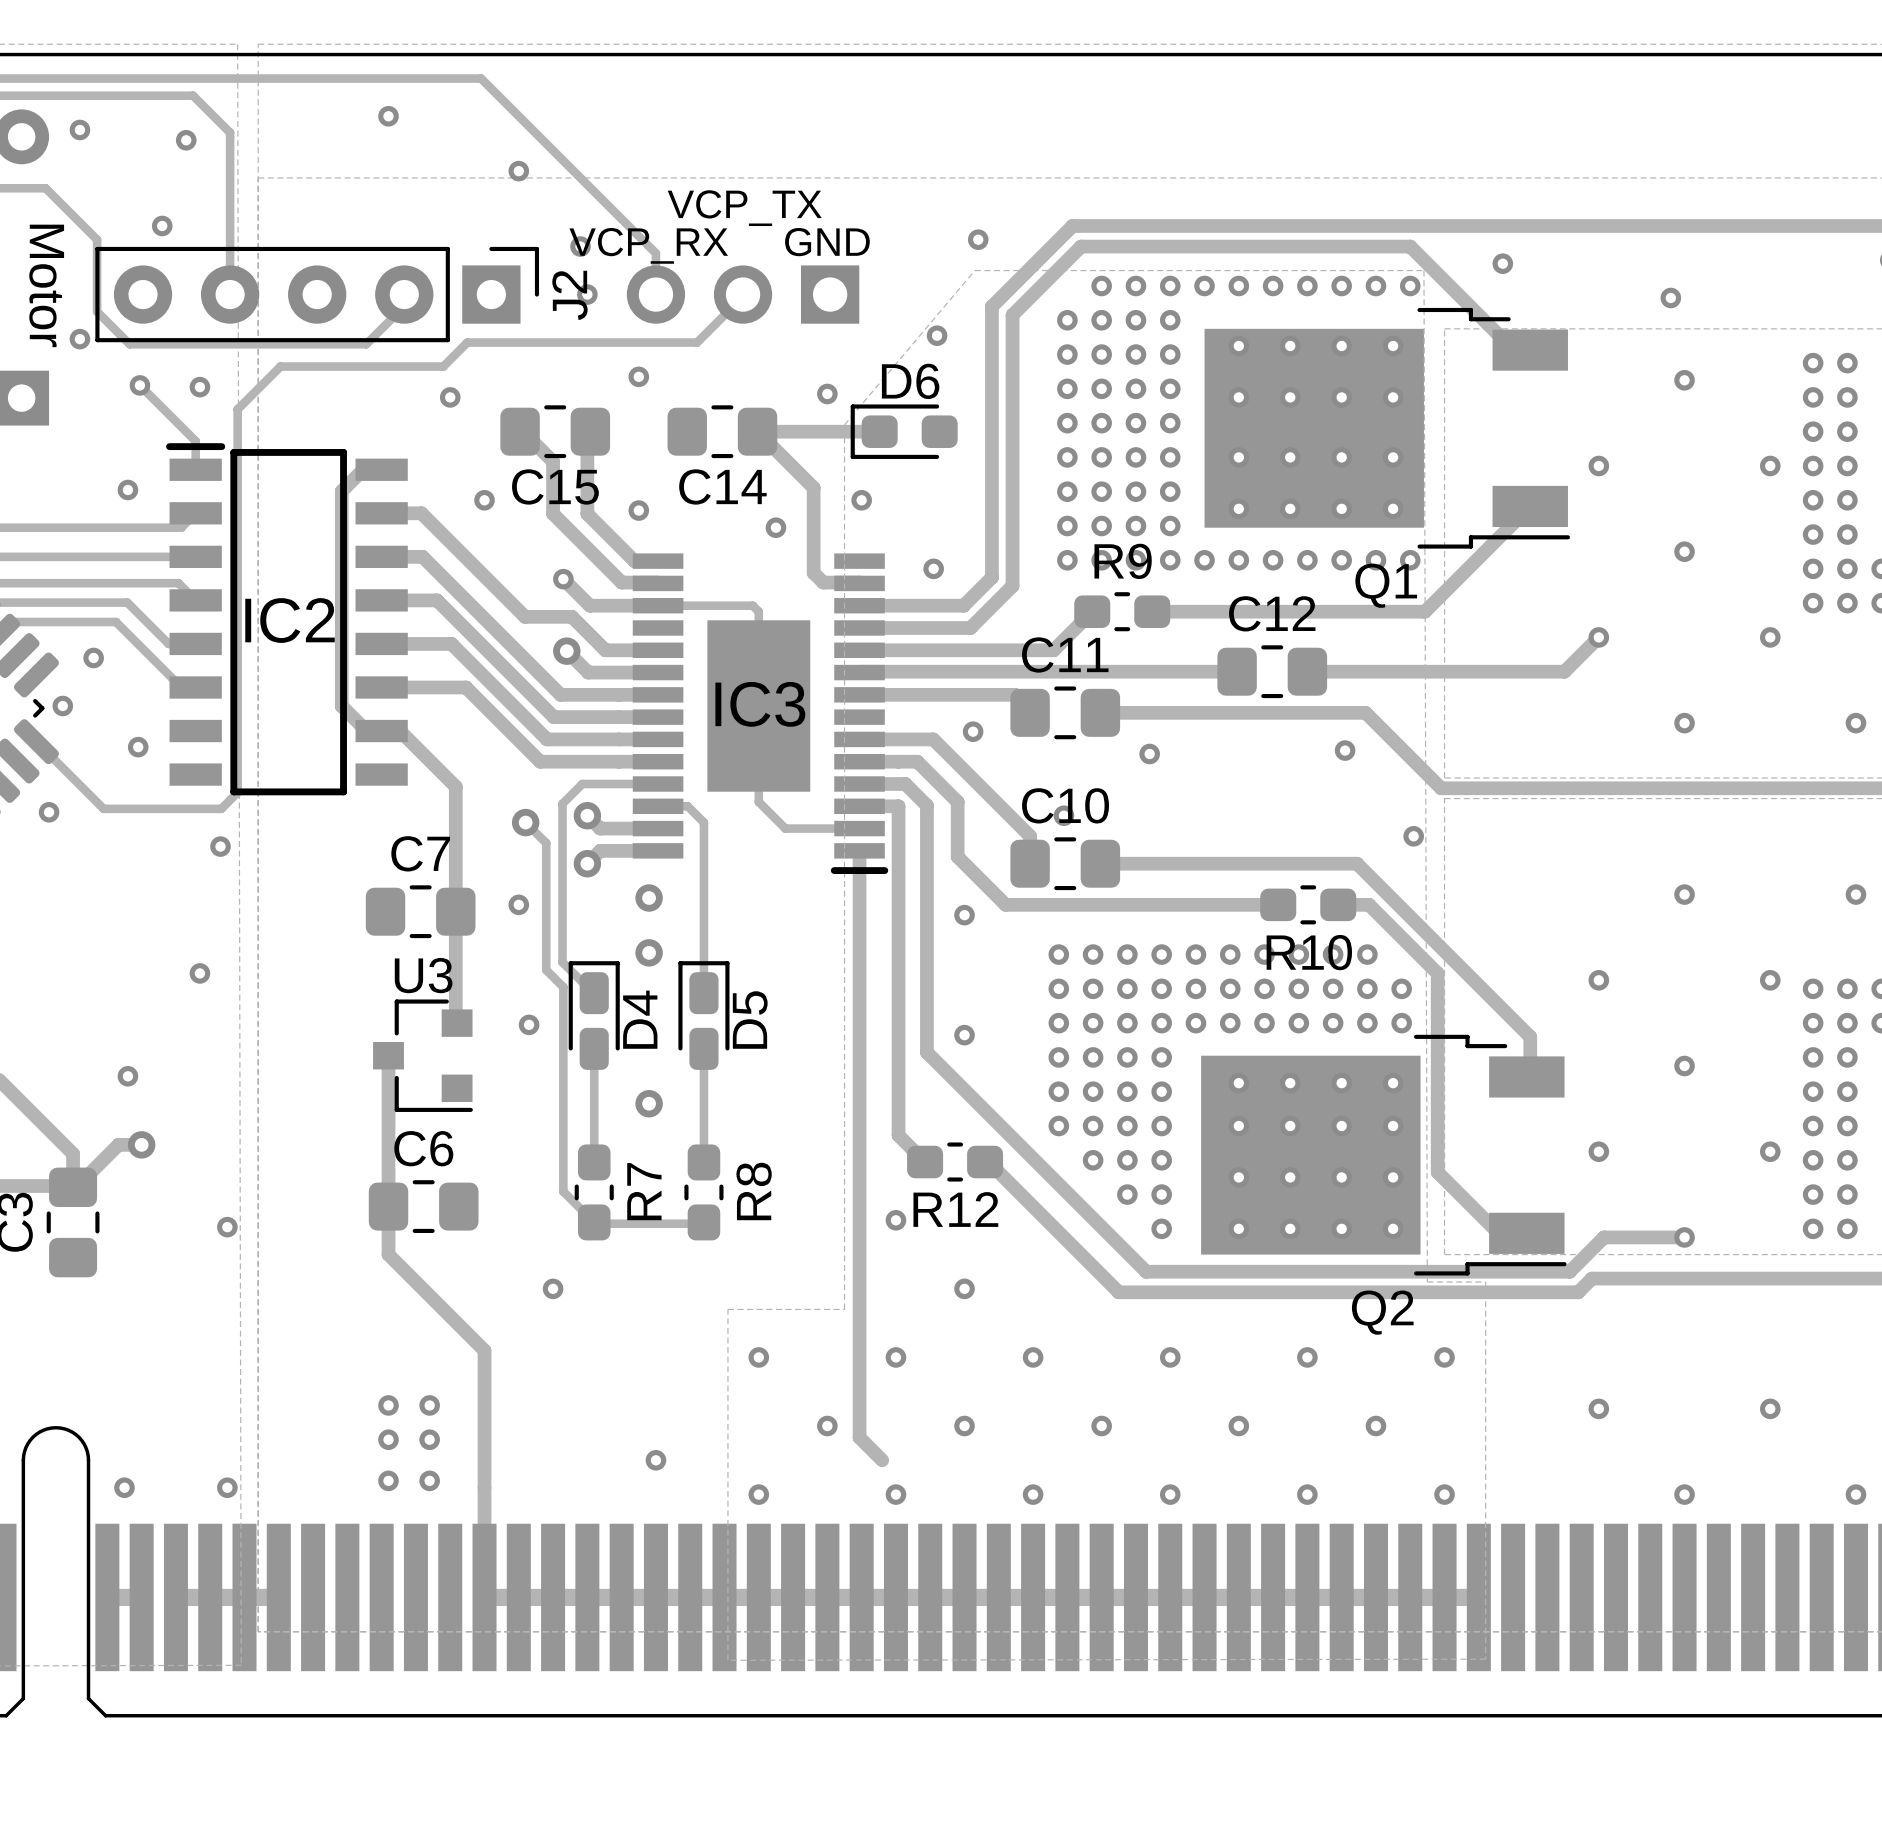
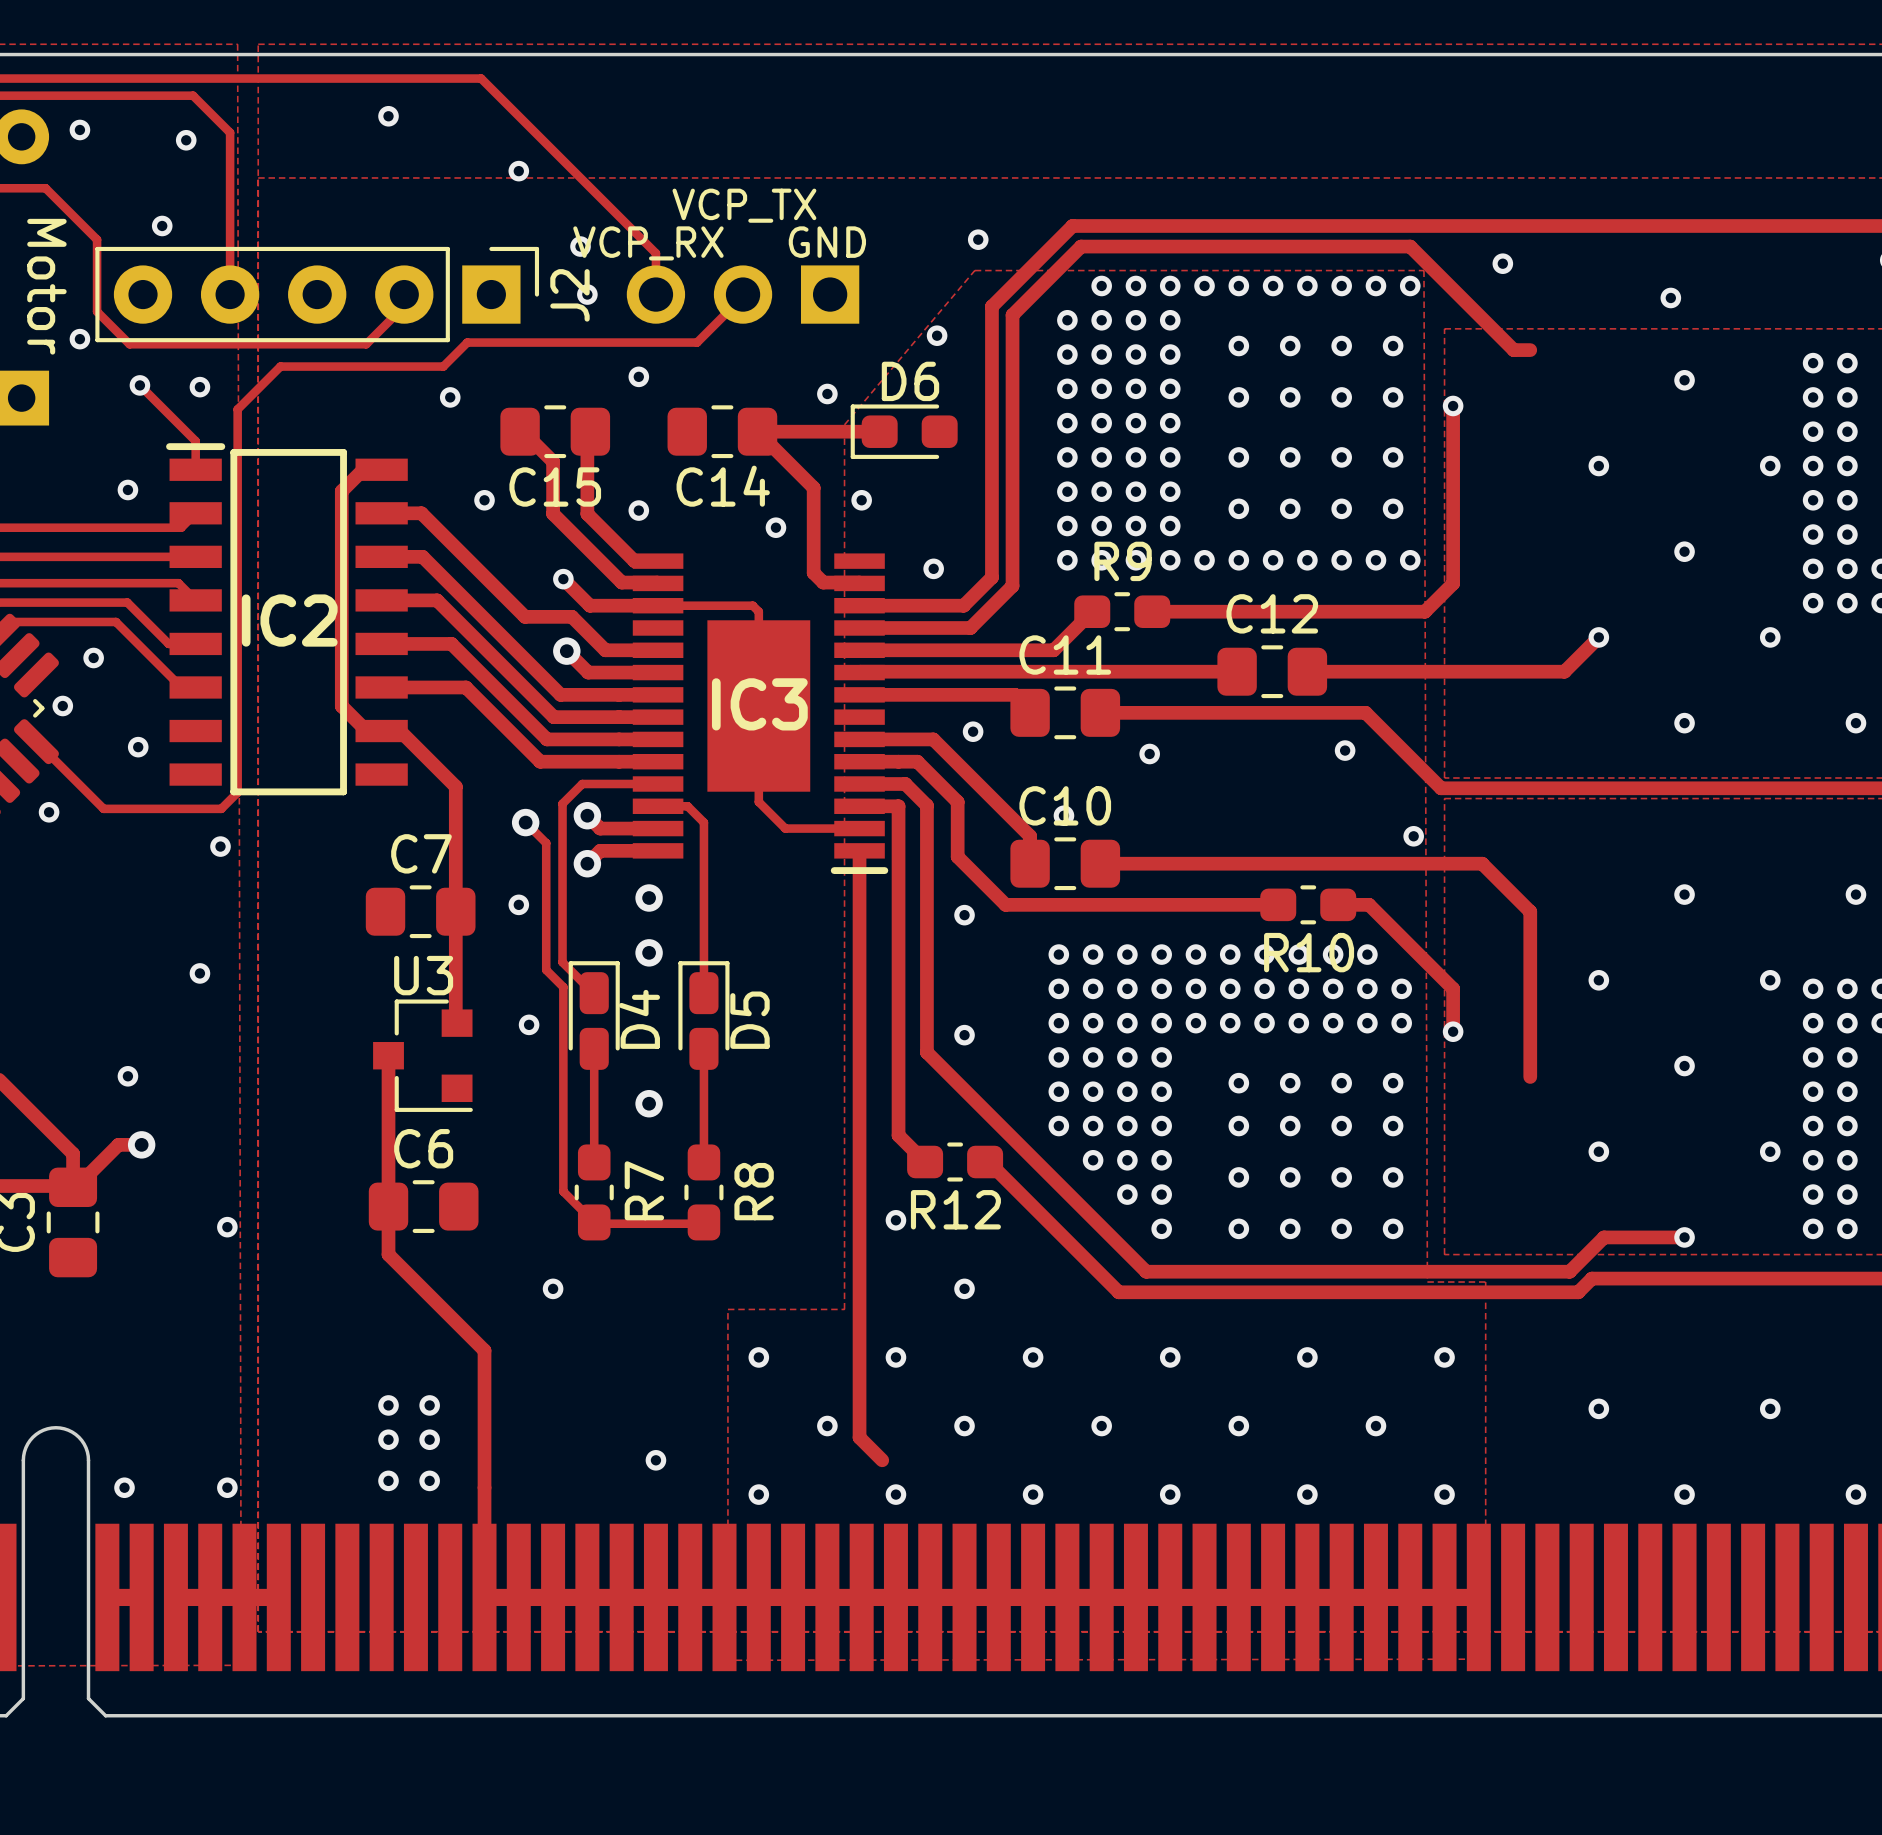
via: none -> (1453, 405)
Q1: (1387, 428) -> none
track: (1534, 510) (1530, 506) (1453, 583) -> (1453, 405) (1453, 583)
track: (1357, 863) (1530, 1036) -> (1357, 863) (1482, 863) (1530, 911) (1530, 1036)
track: (1437, 973) (1437, 1172) (1498, 1233) (1530, 1233) -> (1437, 973) (1453, 988) (1453, 1031)
via: none -> (1453, 1031)
Q2: (1383, 1155) -> none

